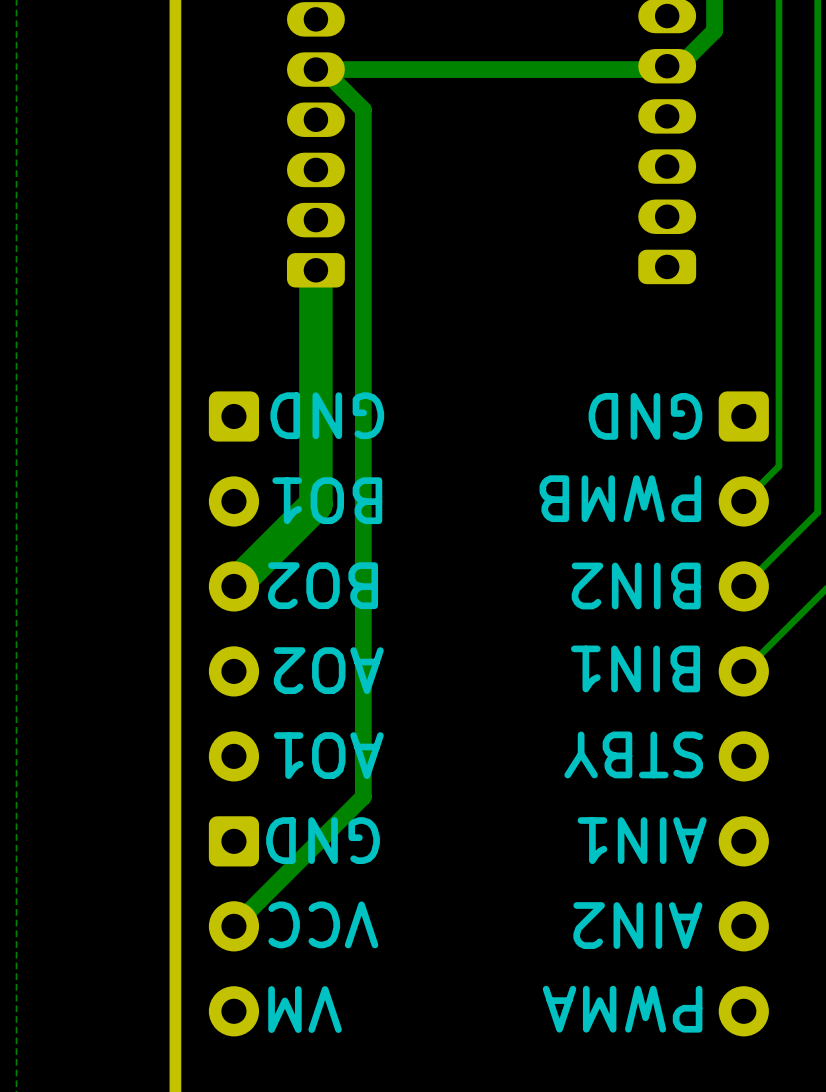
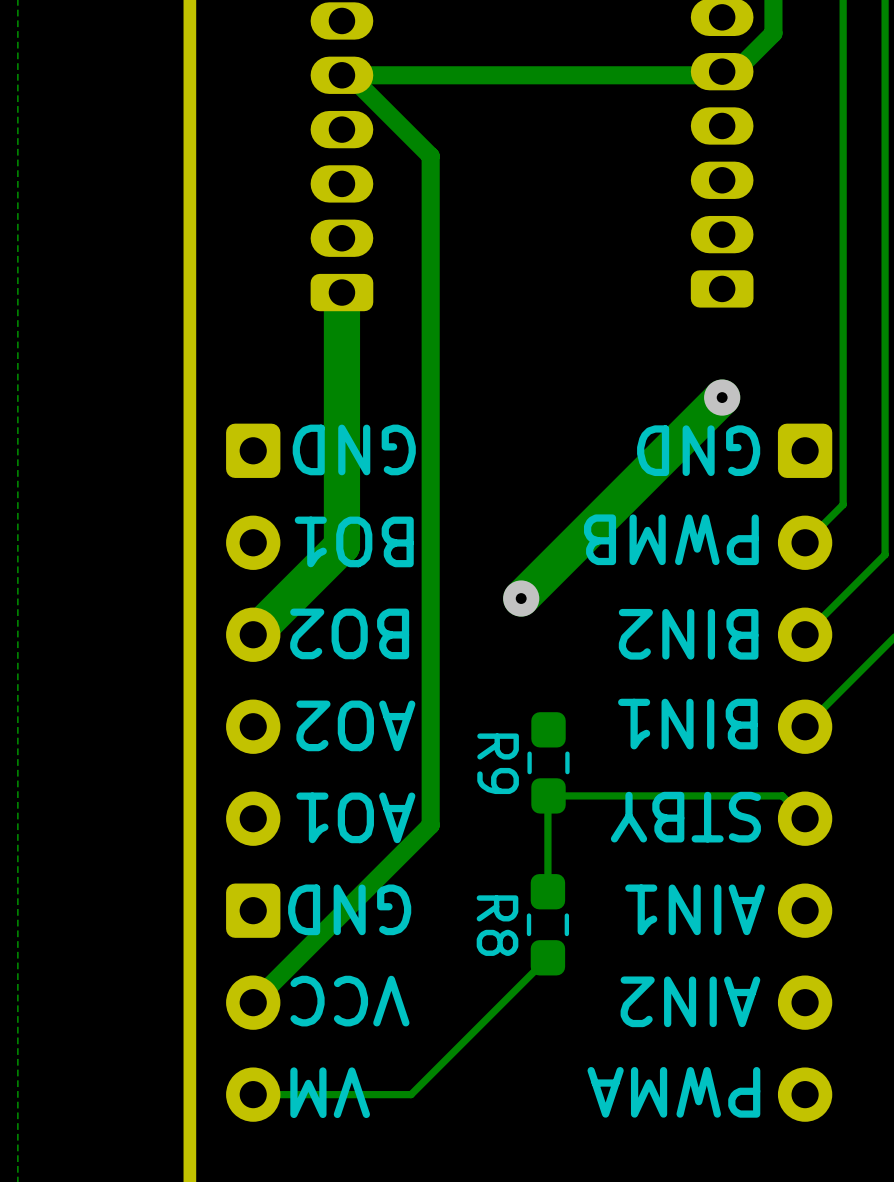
track: (363, 109) (363, 797) -> (393, 118) (430, 156) (430, 825) (393, 862)
track: none -> (722, 397) (521, 598)
via: none -> (722, 397)
via: none -> (521, 598)
R9: none -> (548, 762)
track: none -> (805, 818) (782, 795) (548, 795) (547, 891)
R8: none -> (547, 924)
track: none -> (547, 957) (411, 1094) (253, 1094)

